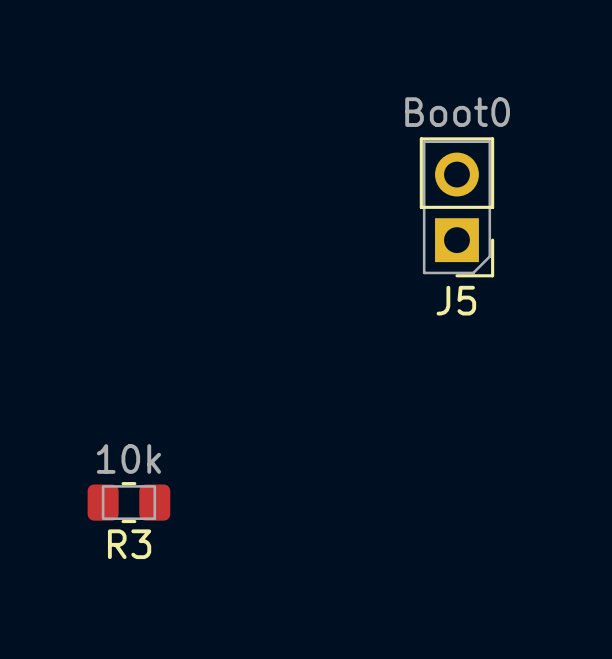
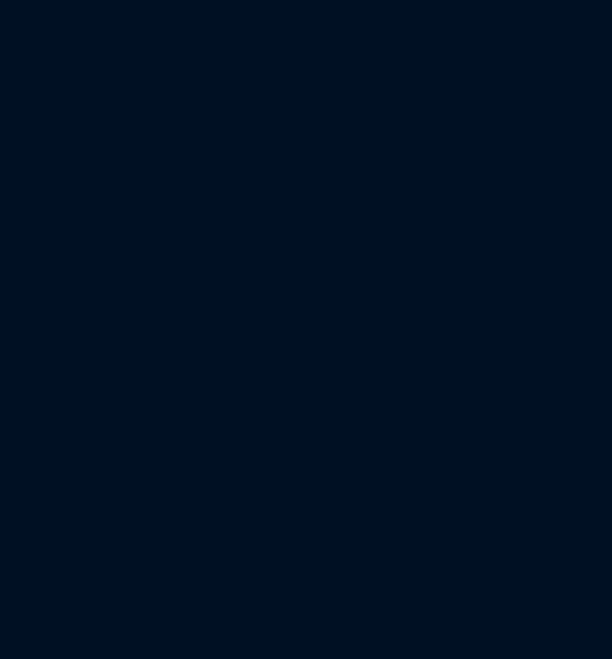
J5: Boot0 (456, 207) -> none
R3: 10k (128, 502) -> none

